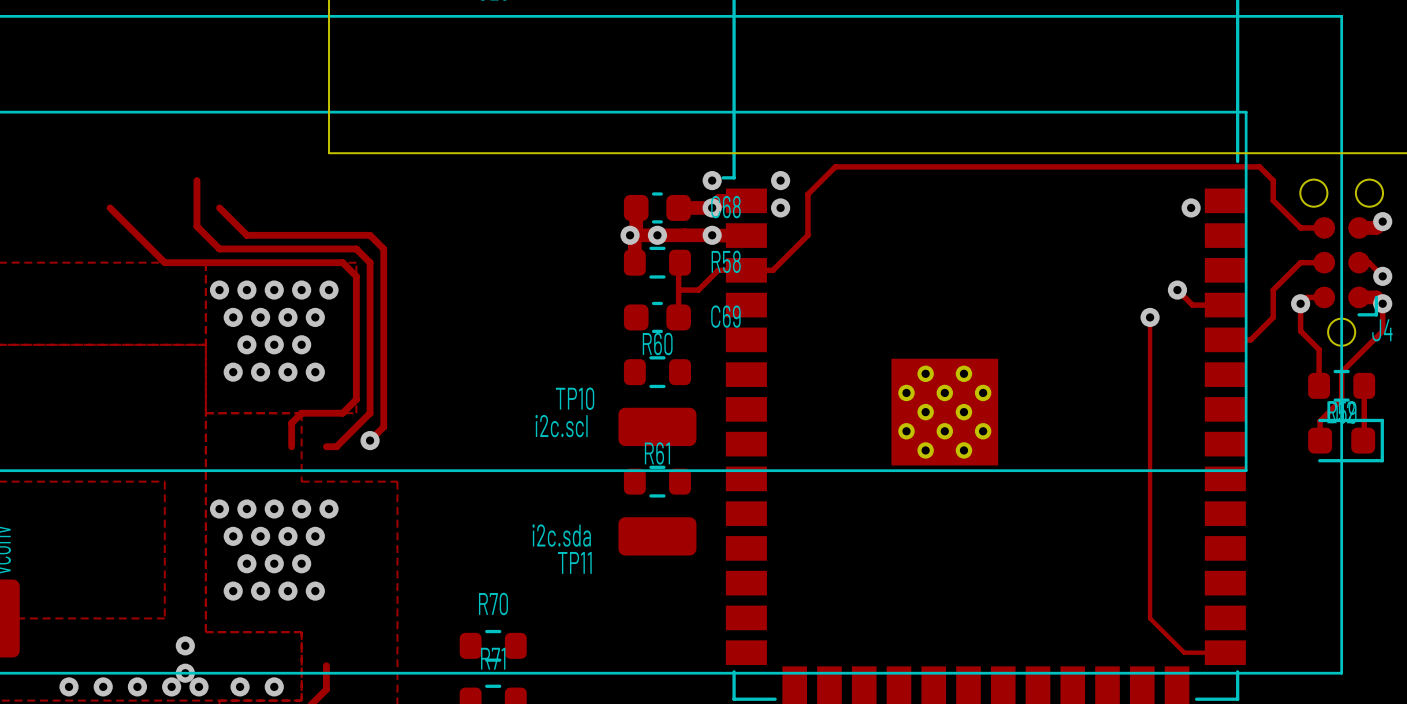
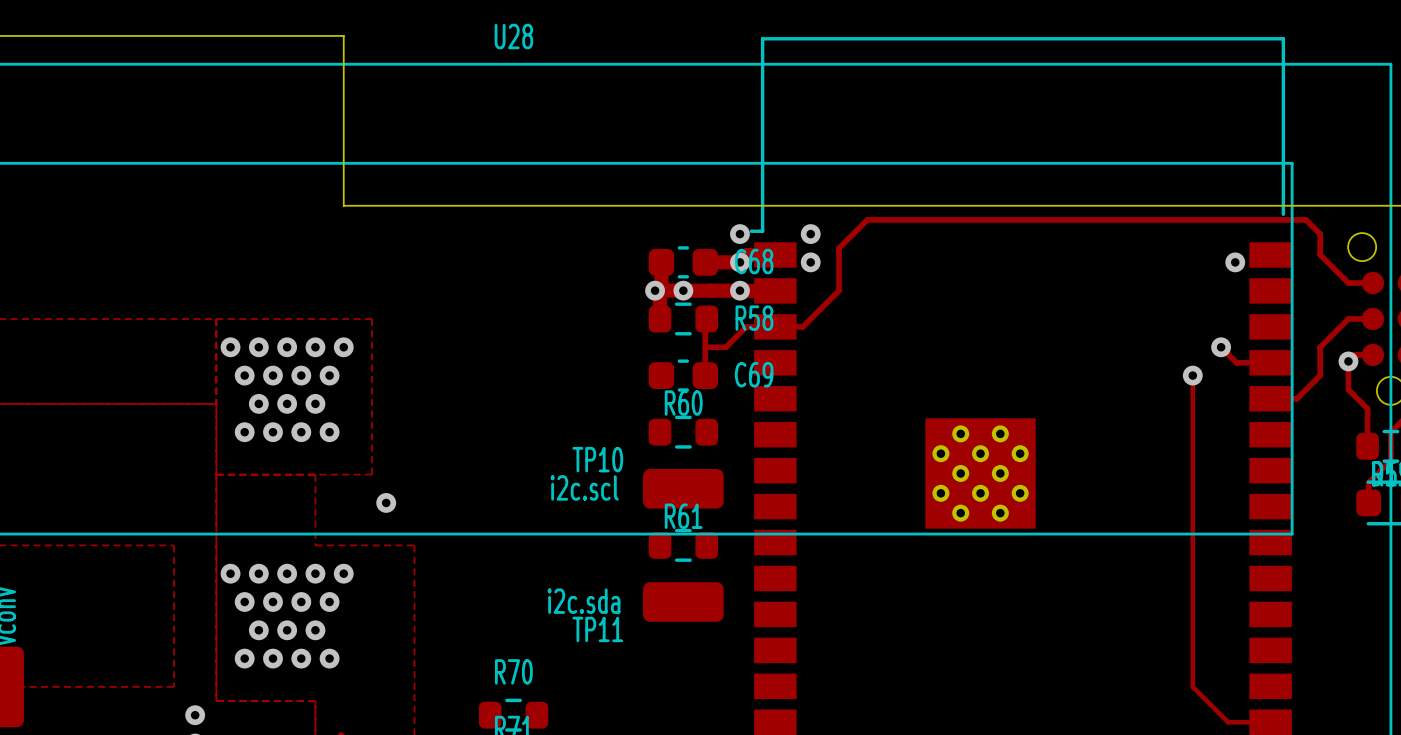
track: (196, 180) (196, 226) (219, 248) (356, 248) (370, 262) (370, 413) (336, 446) (326, 446) -> none
track: (110, 207) (164, 262) (342, 262) (356, 276) (356, 399) (342, 413) (301, 413) (291, 423) (291, 446) -> none
track: (219, 207) (246, 235) (370, 235) (383, 248) (383, 426) (370, 440) -> none

